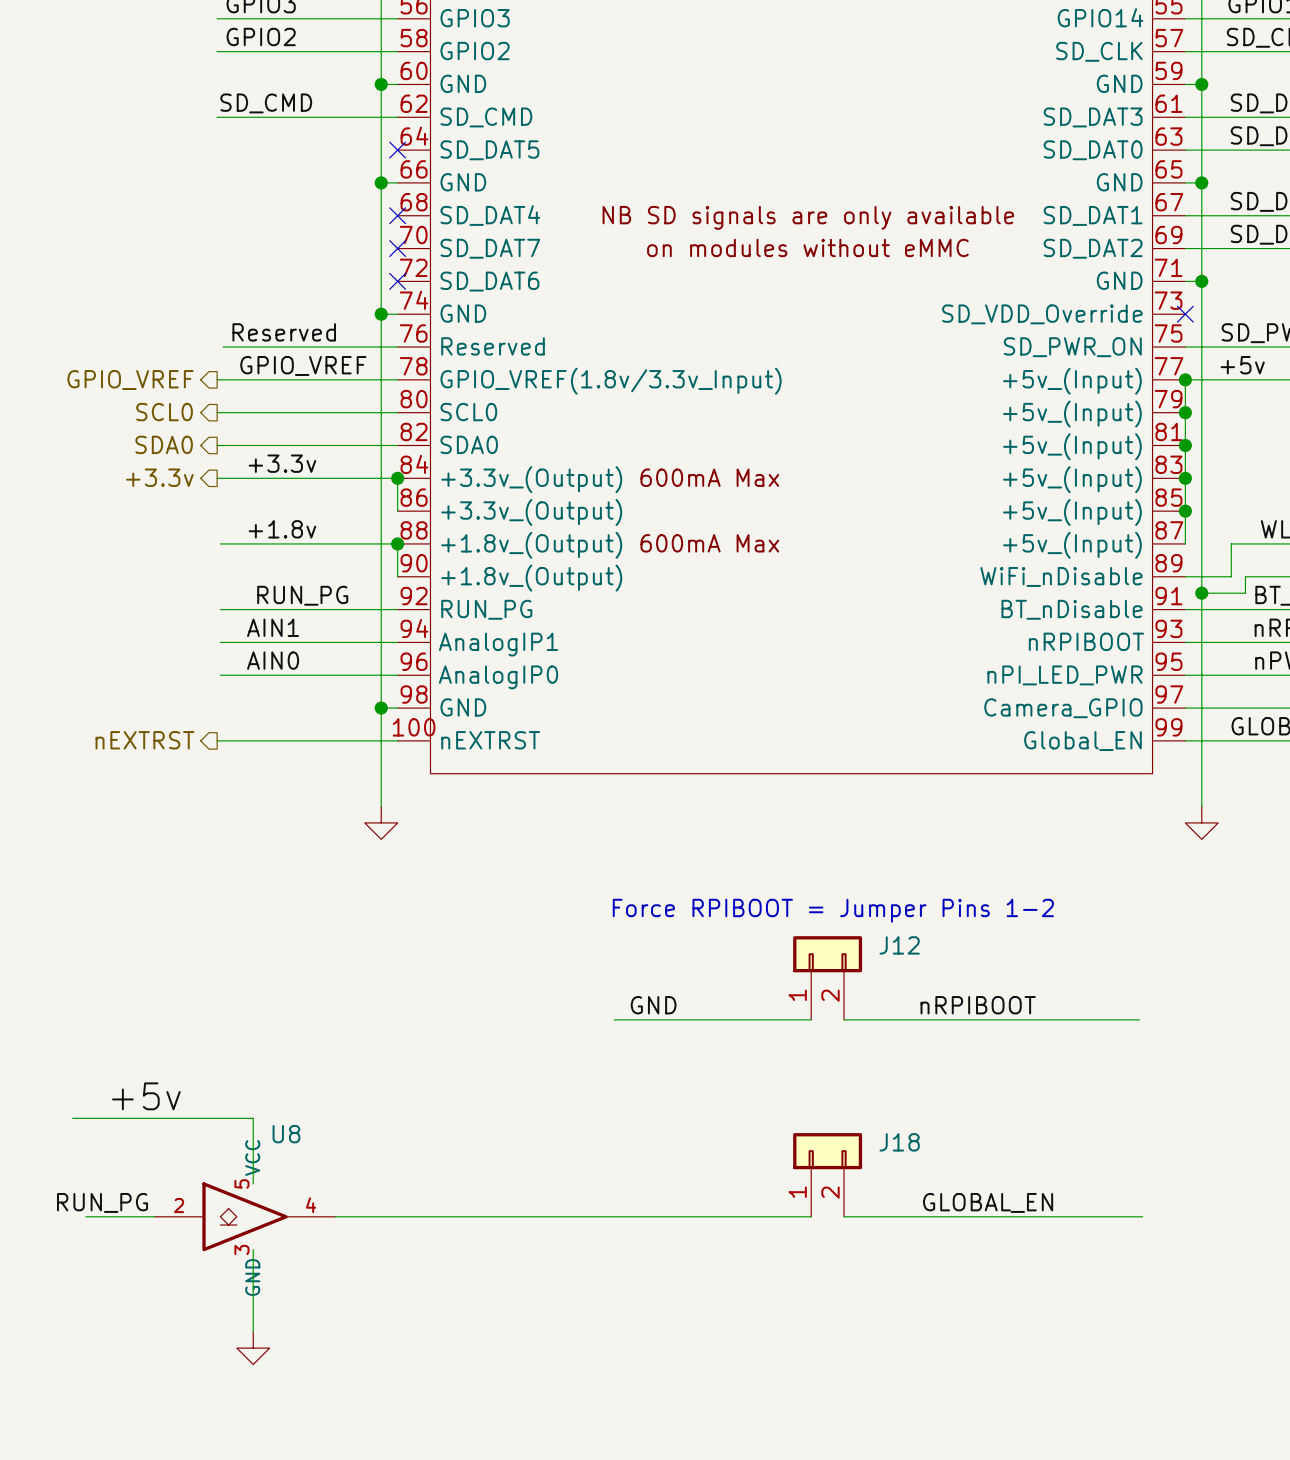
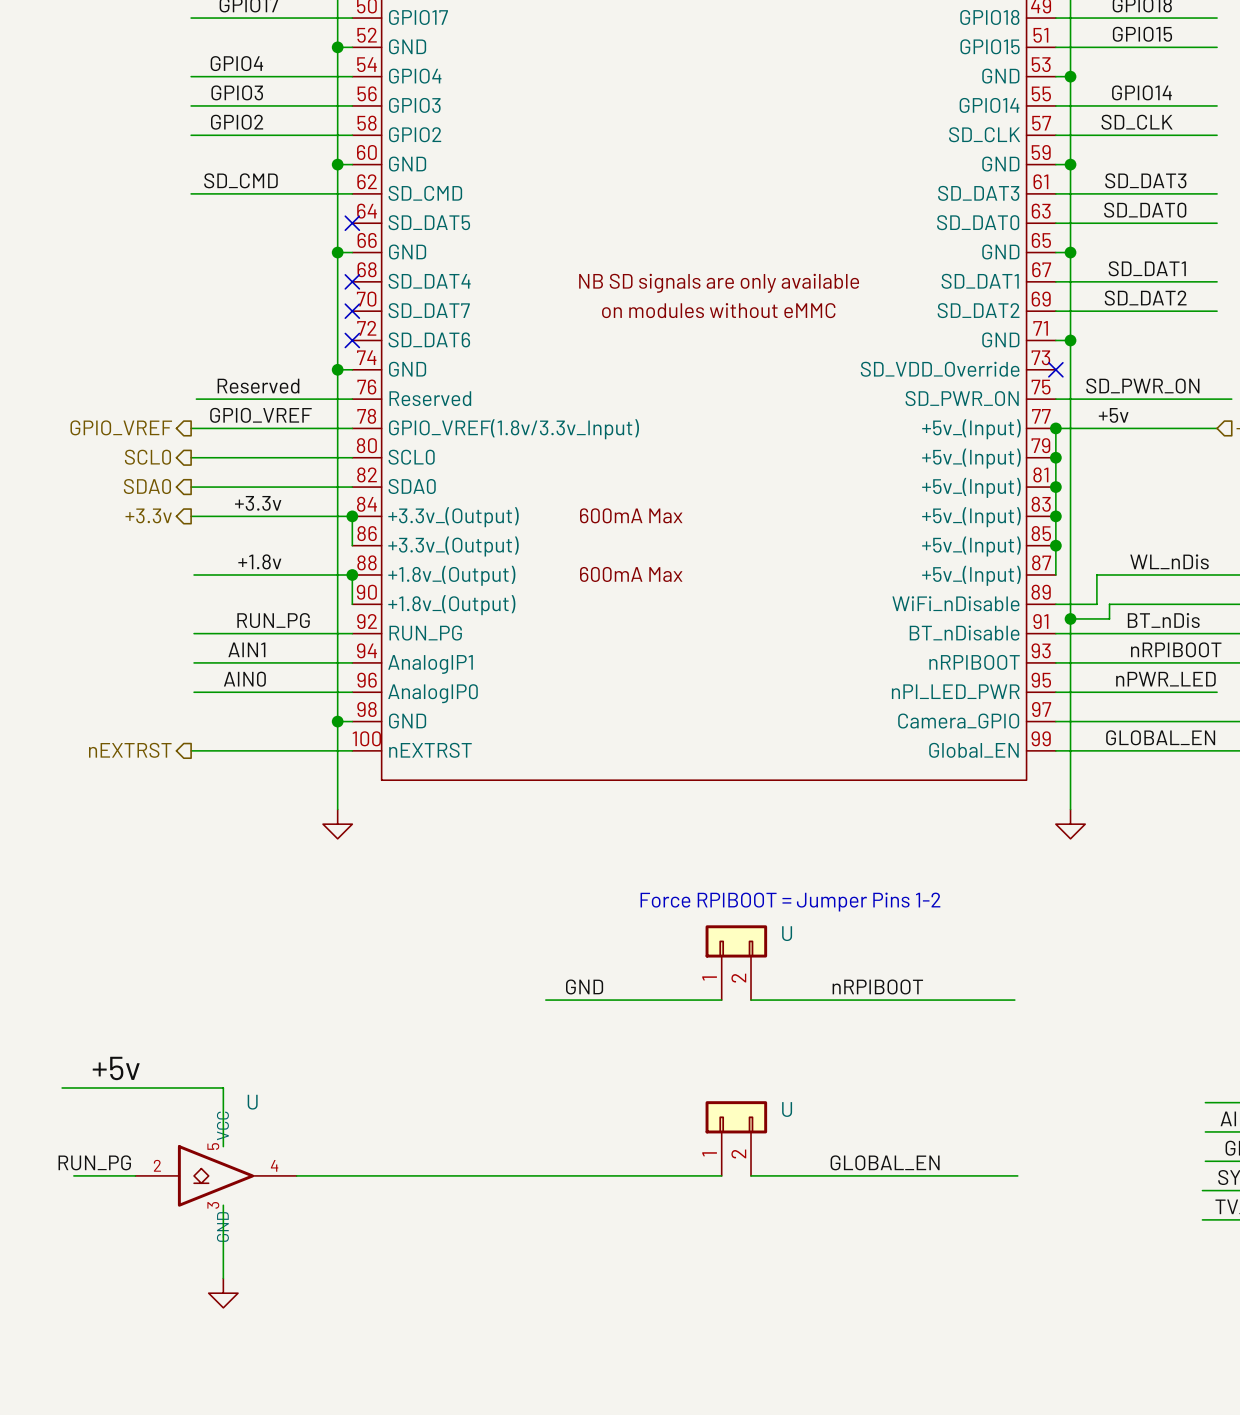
J12 name: J12 (899, 945) -> U (787, 933)
U8 name: U8 (286, 1134) -> U (252, 1102)
J18 name: J18 (899, 1142) -> U (787, 1109)

